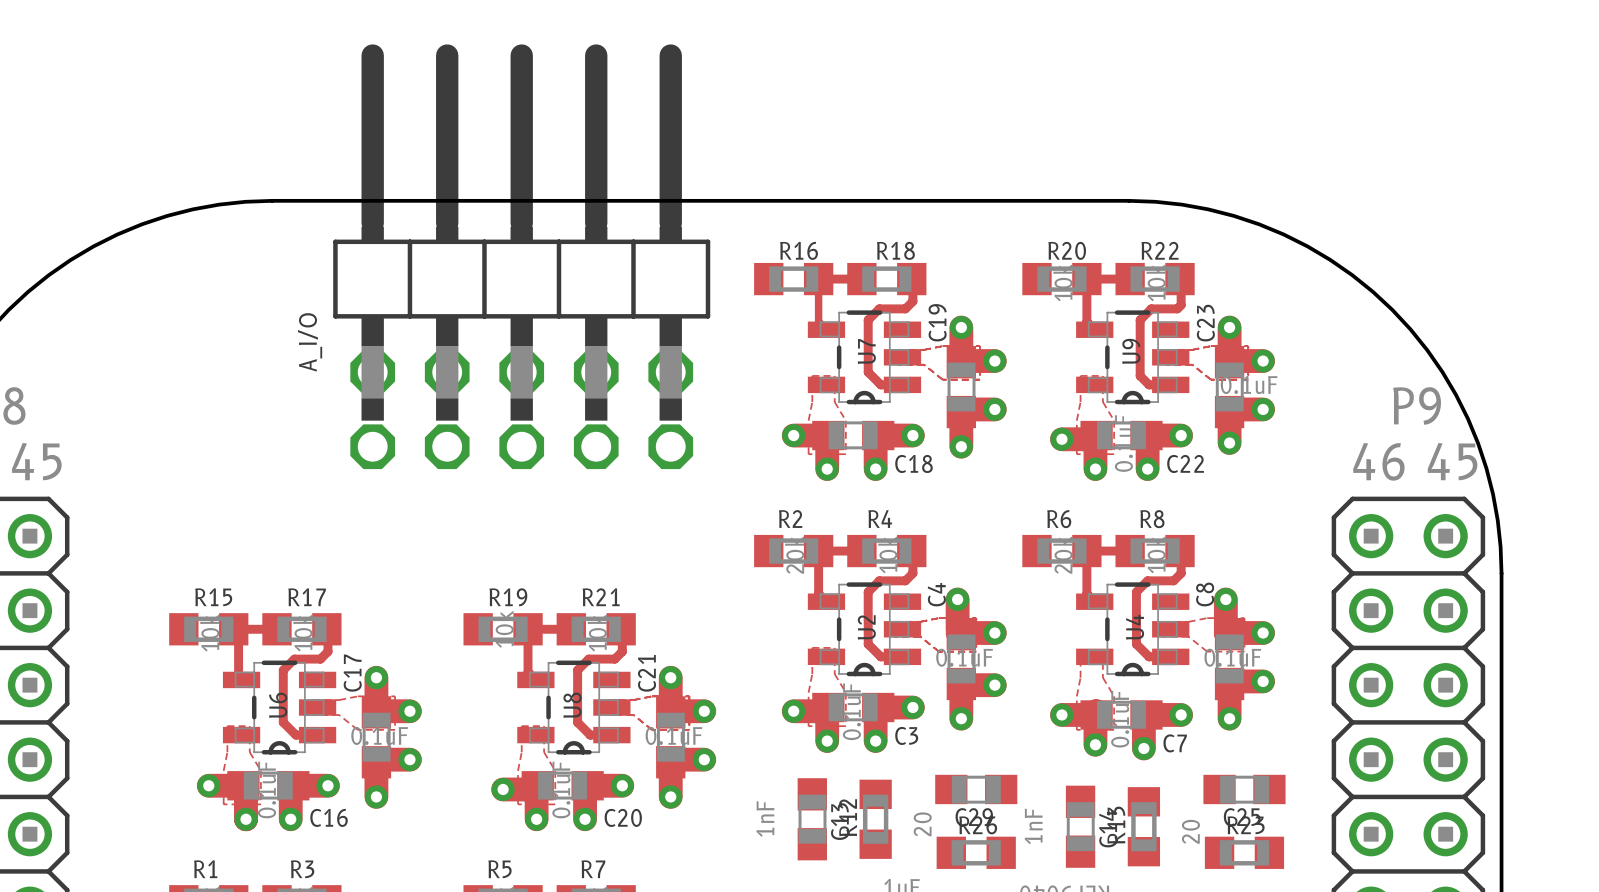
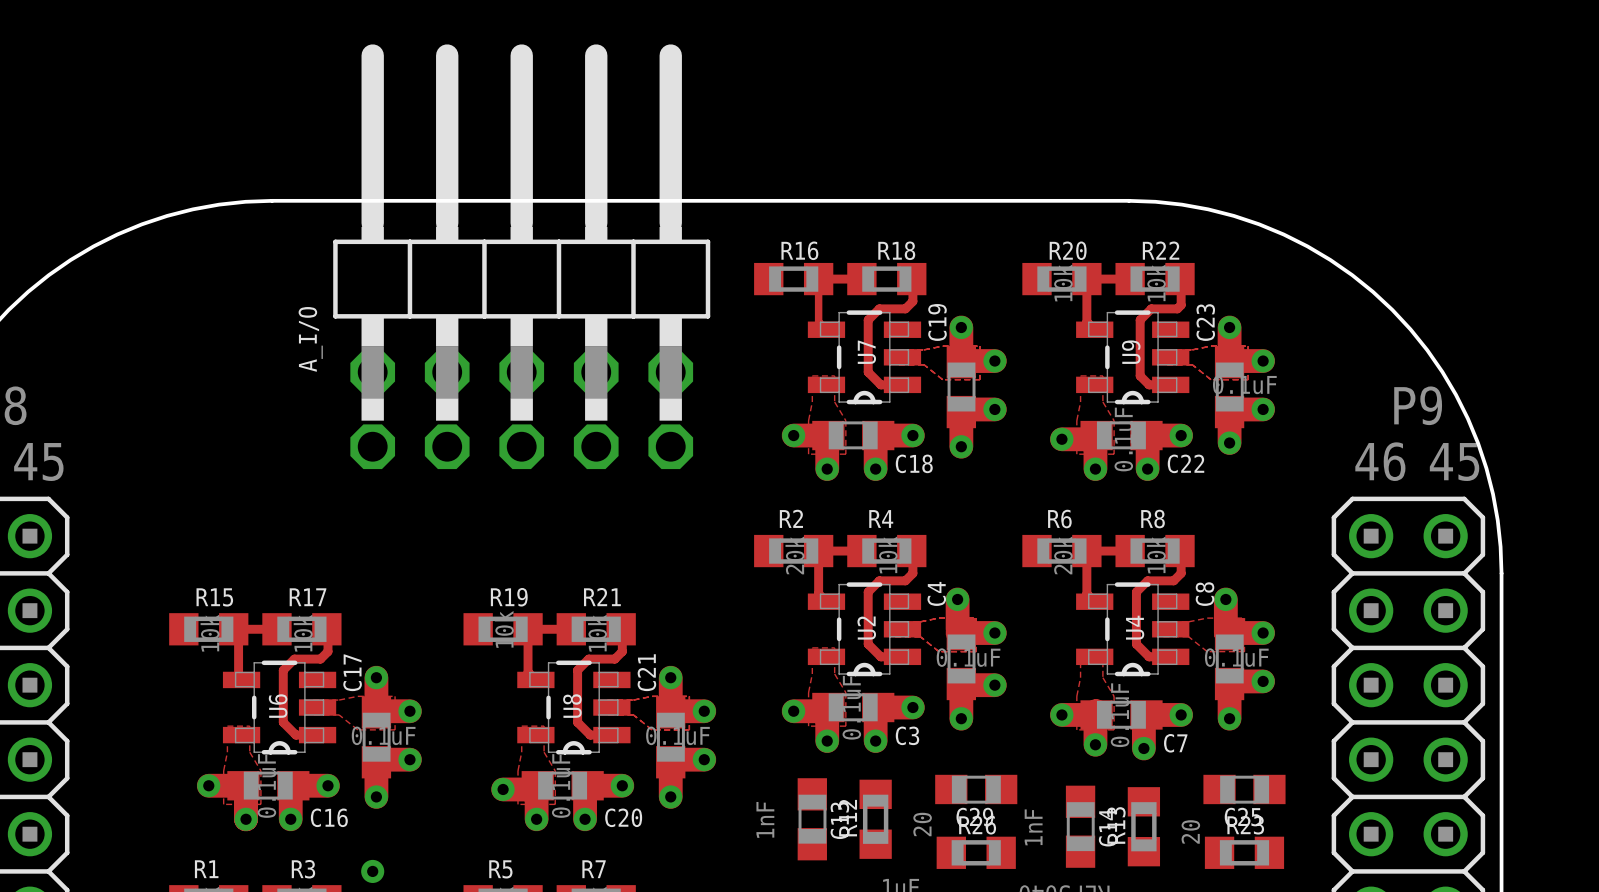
via: none -> (372, 871)

